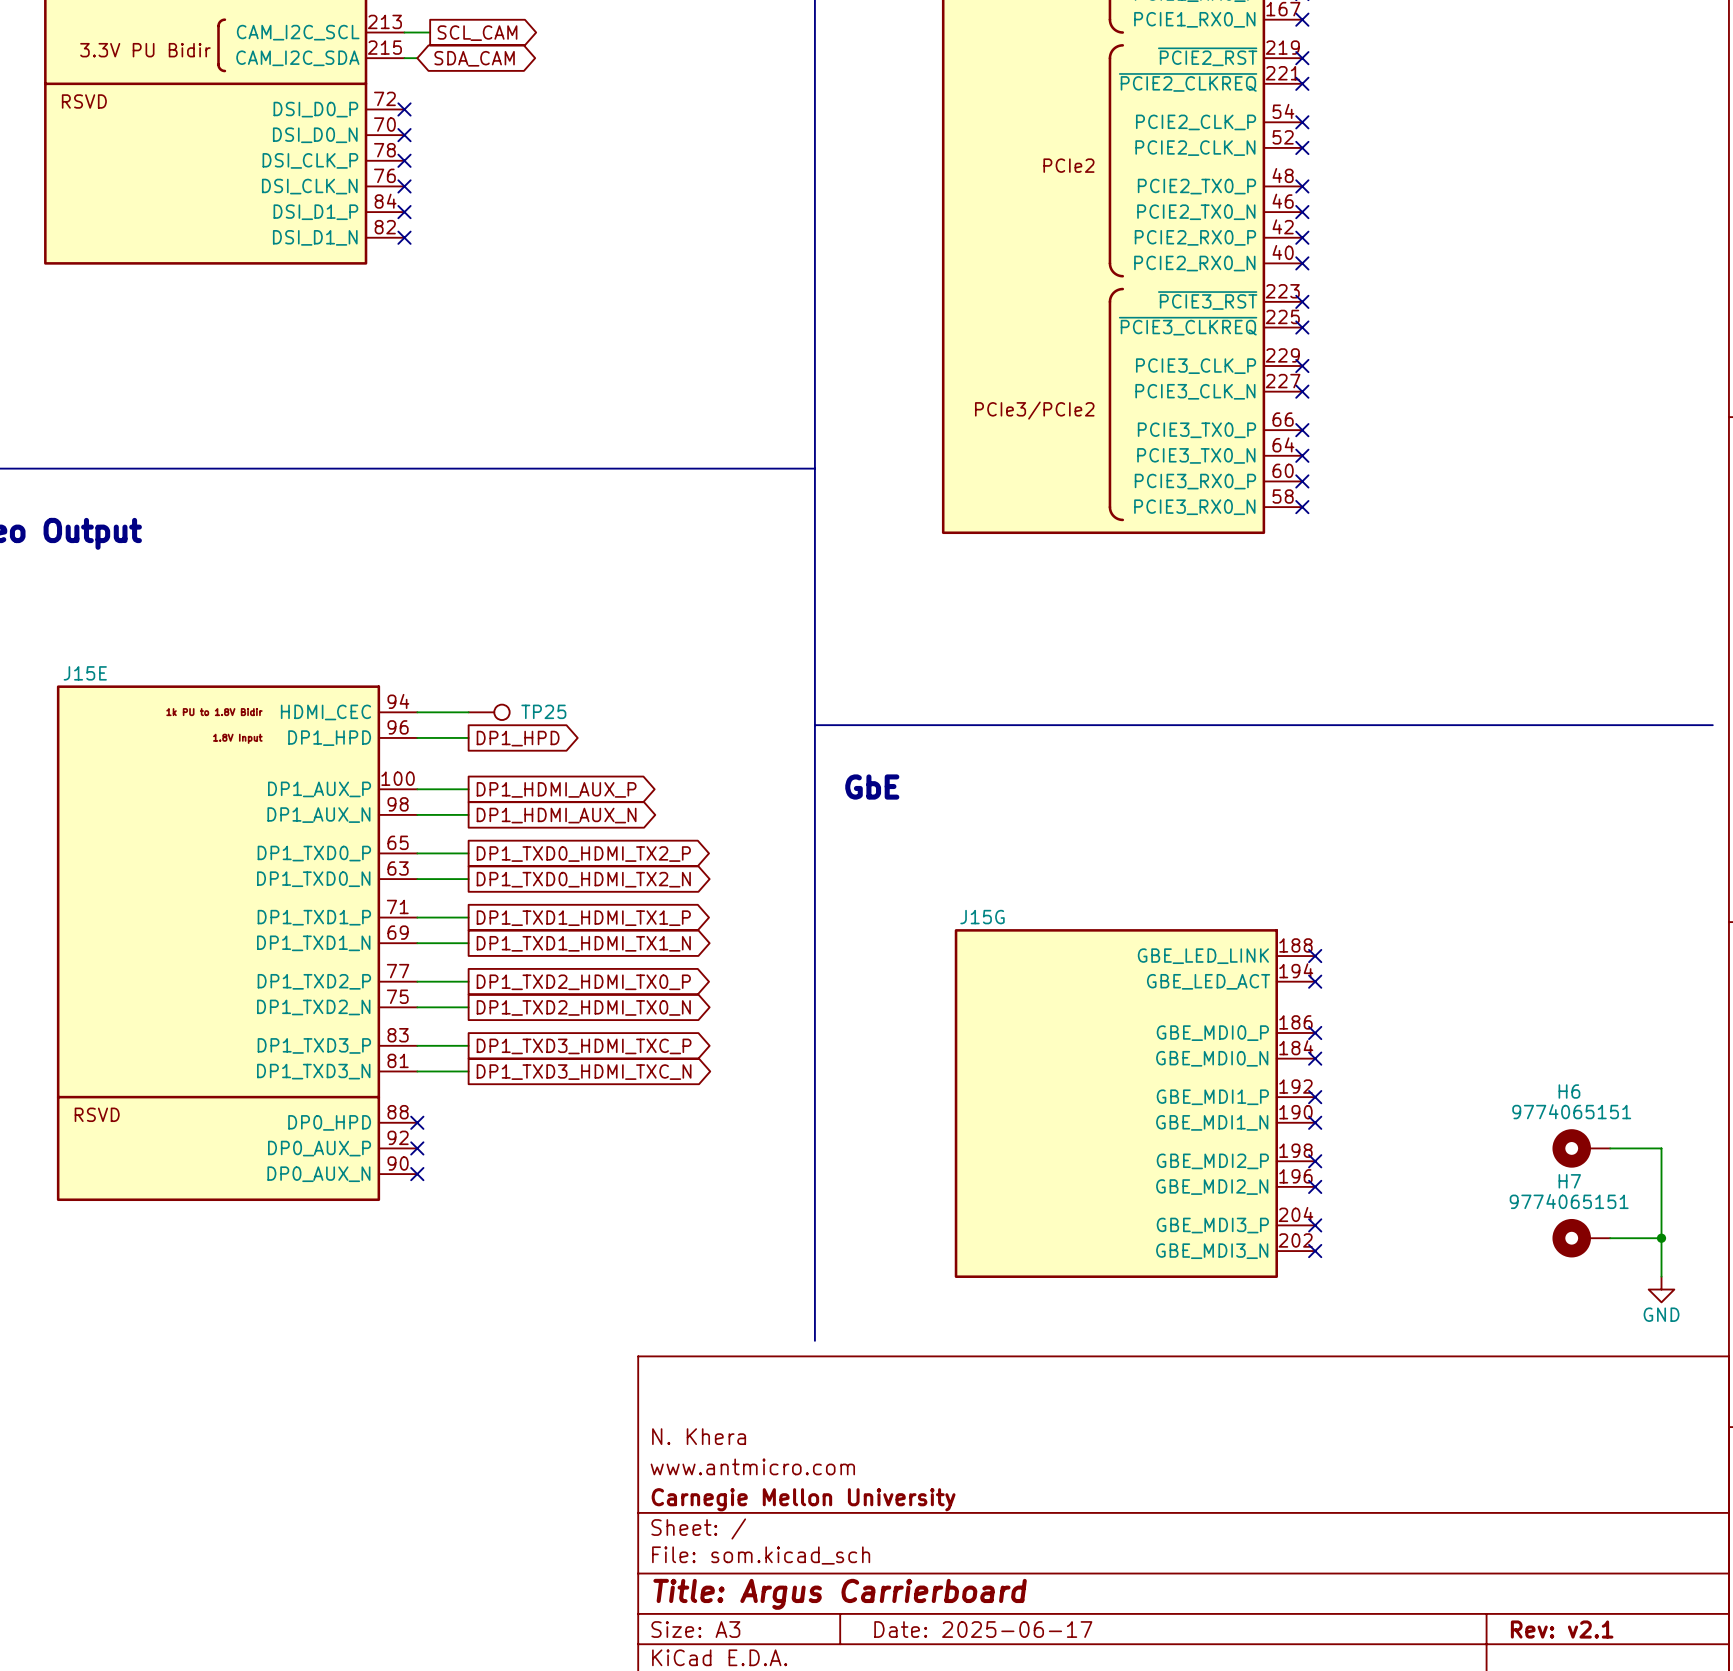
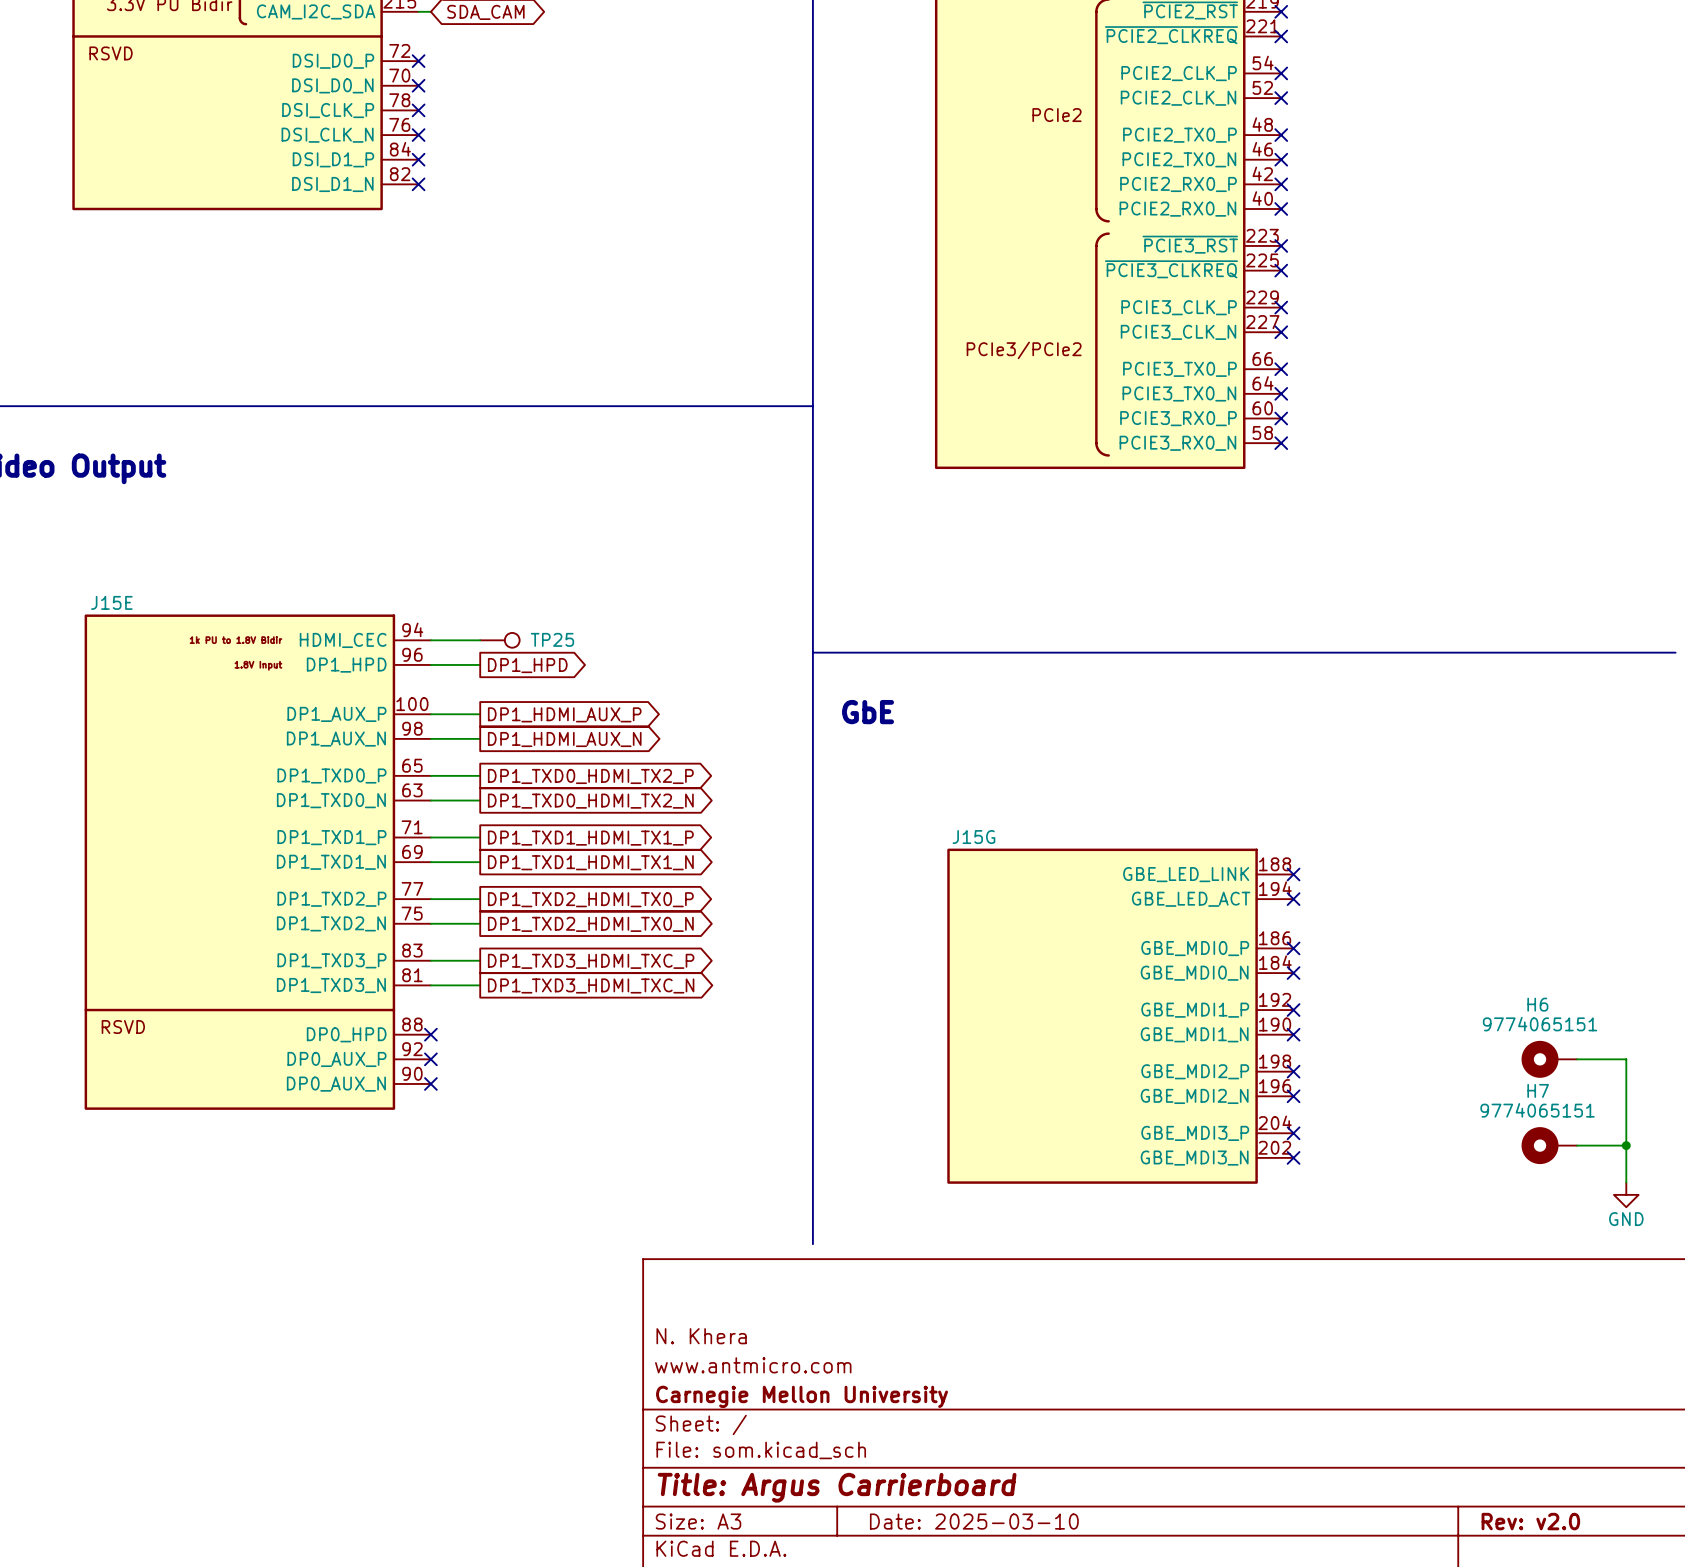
title block: Date: 2025-06-17 (983, 1629) -> Date: 2025-03-10 (974, 1521)
title block: Rev: v2.1 (1562, 1629) -> Rev: v2.0 (1530, 1521)

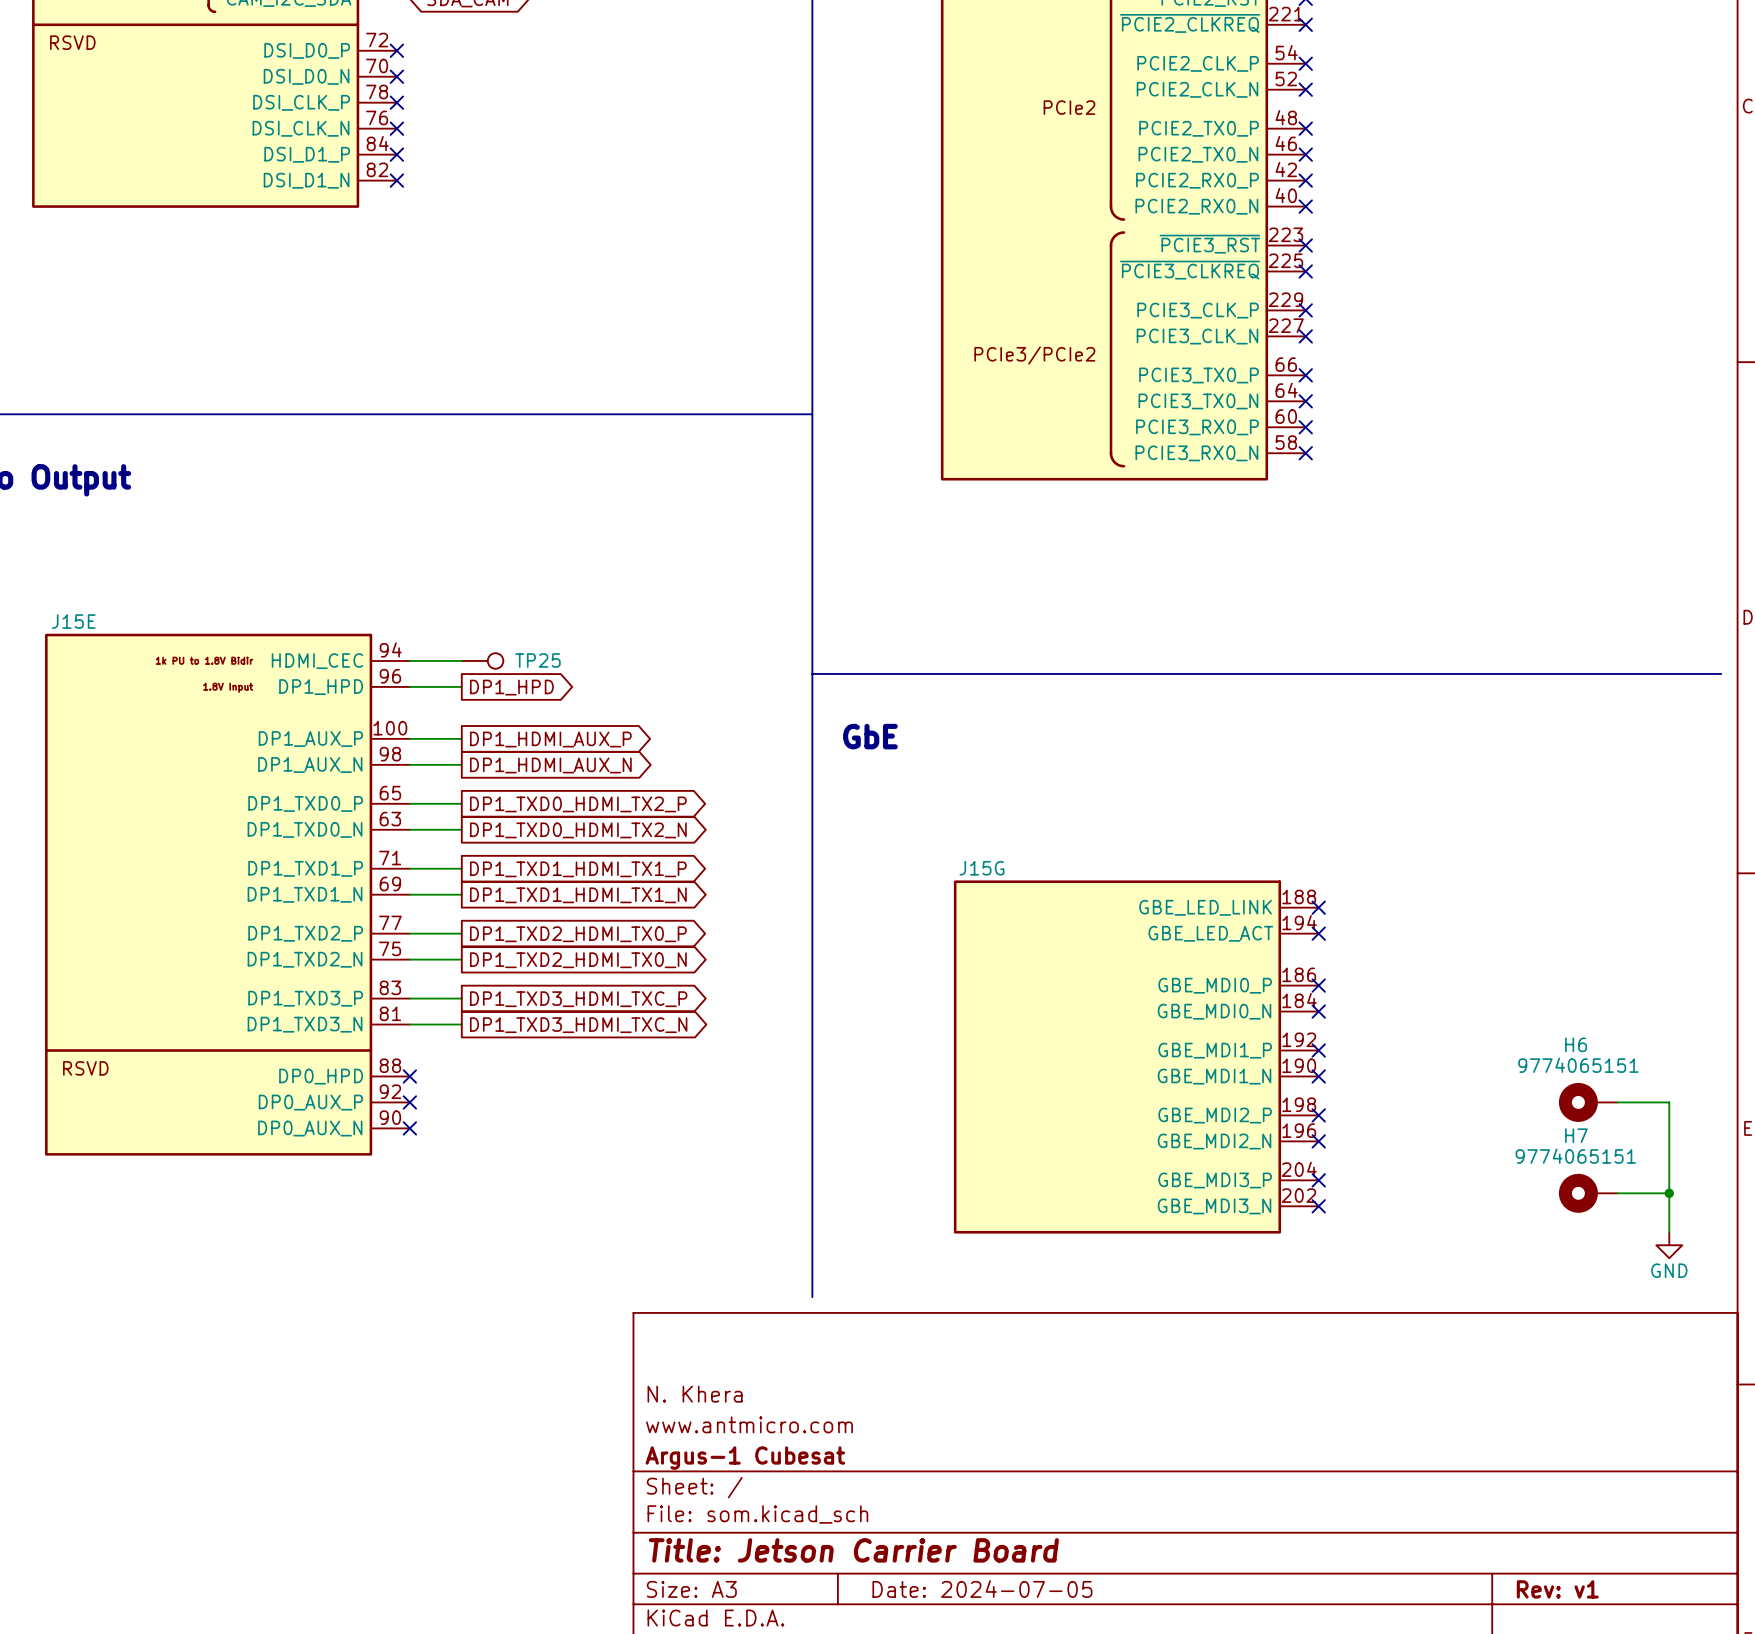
title block: Carnegie Mellon University (802, 1396) -> Argus-1 Cubesat (745, 1458)
title block: Title: Argus Carrierboard (837, 1487) -> Title: Jetson Carrier Board (853, 1550)
title block: Date: 2025-03-10 (974, 1521) -> Date: 2024-07-05 (982, 1589)
title block: Rev: v2.0 (1530, 1521) -> Rev: v1 (1557, 1589)

